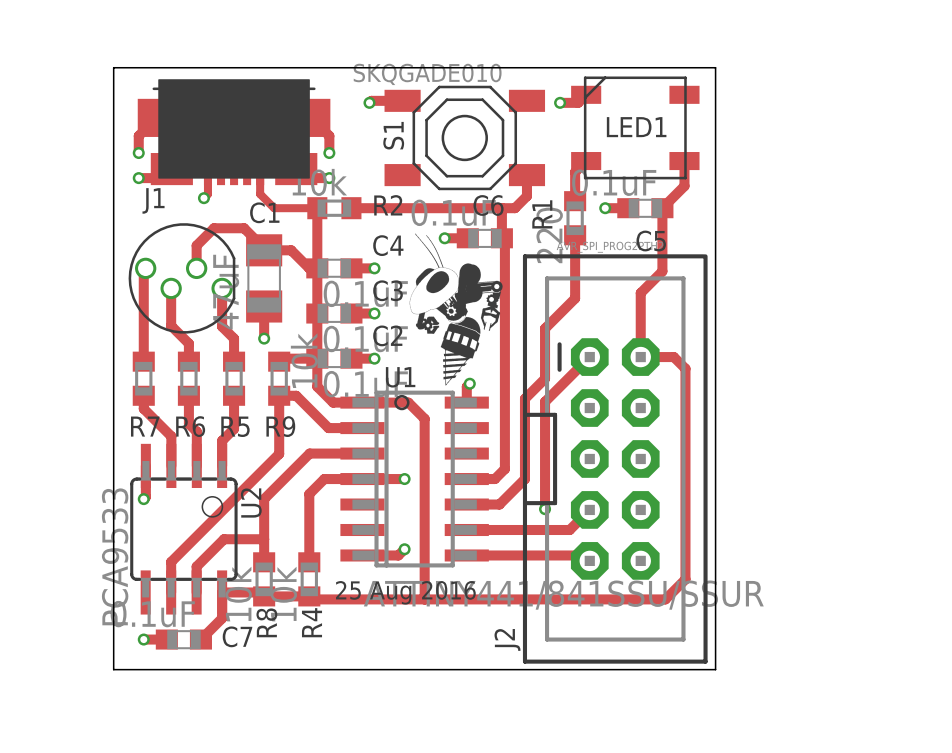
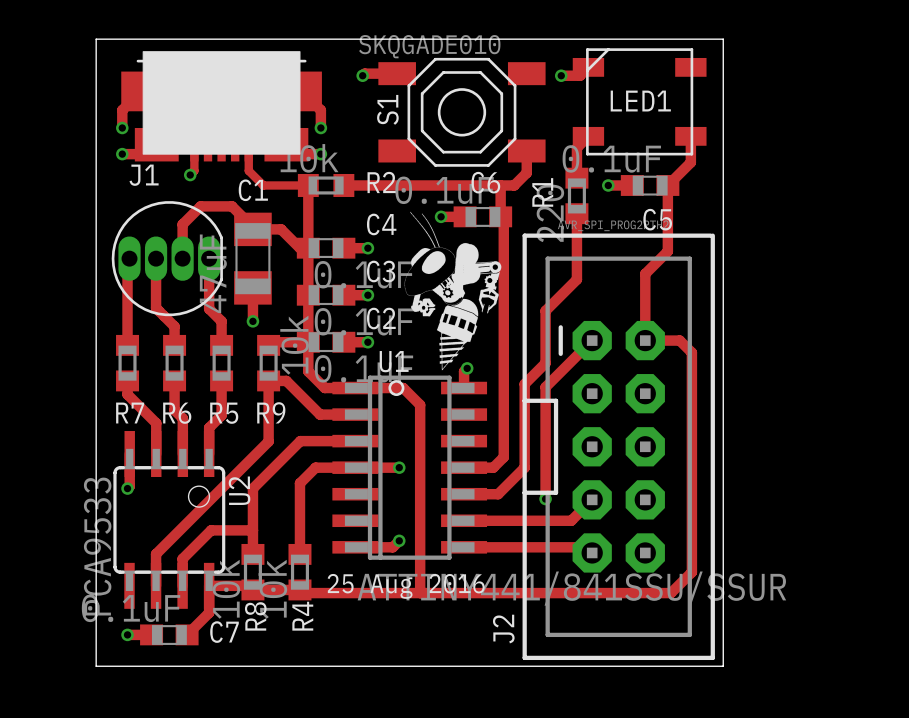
part footprint: [128, 223, 236, 334] -> [111, 201, 223, 317]

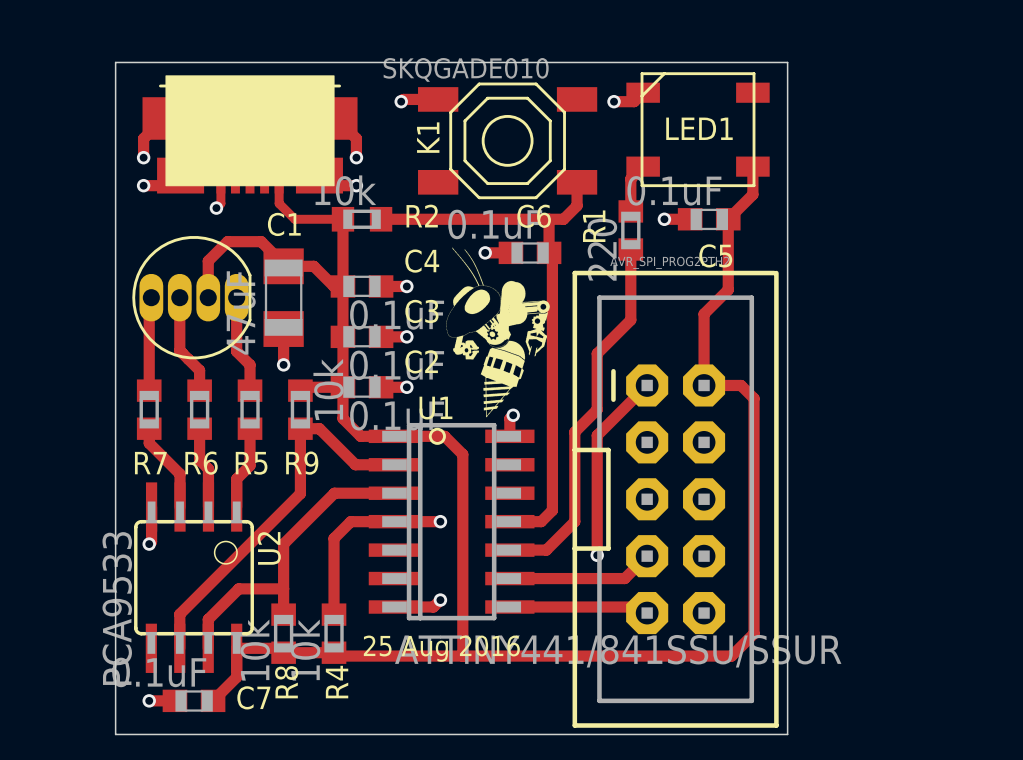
S1 name: S1 (387, 109) -> K1 (428, 137)
text: J1 (144, 175) -> none
text: J2 (503, 629) -> none

